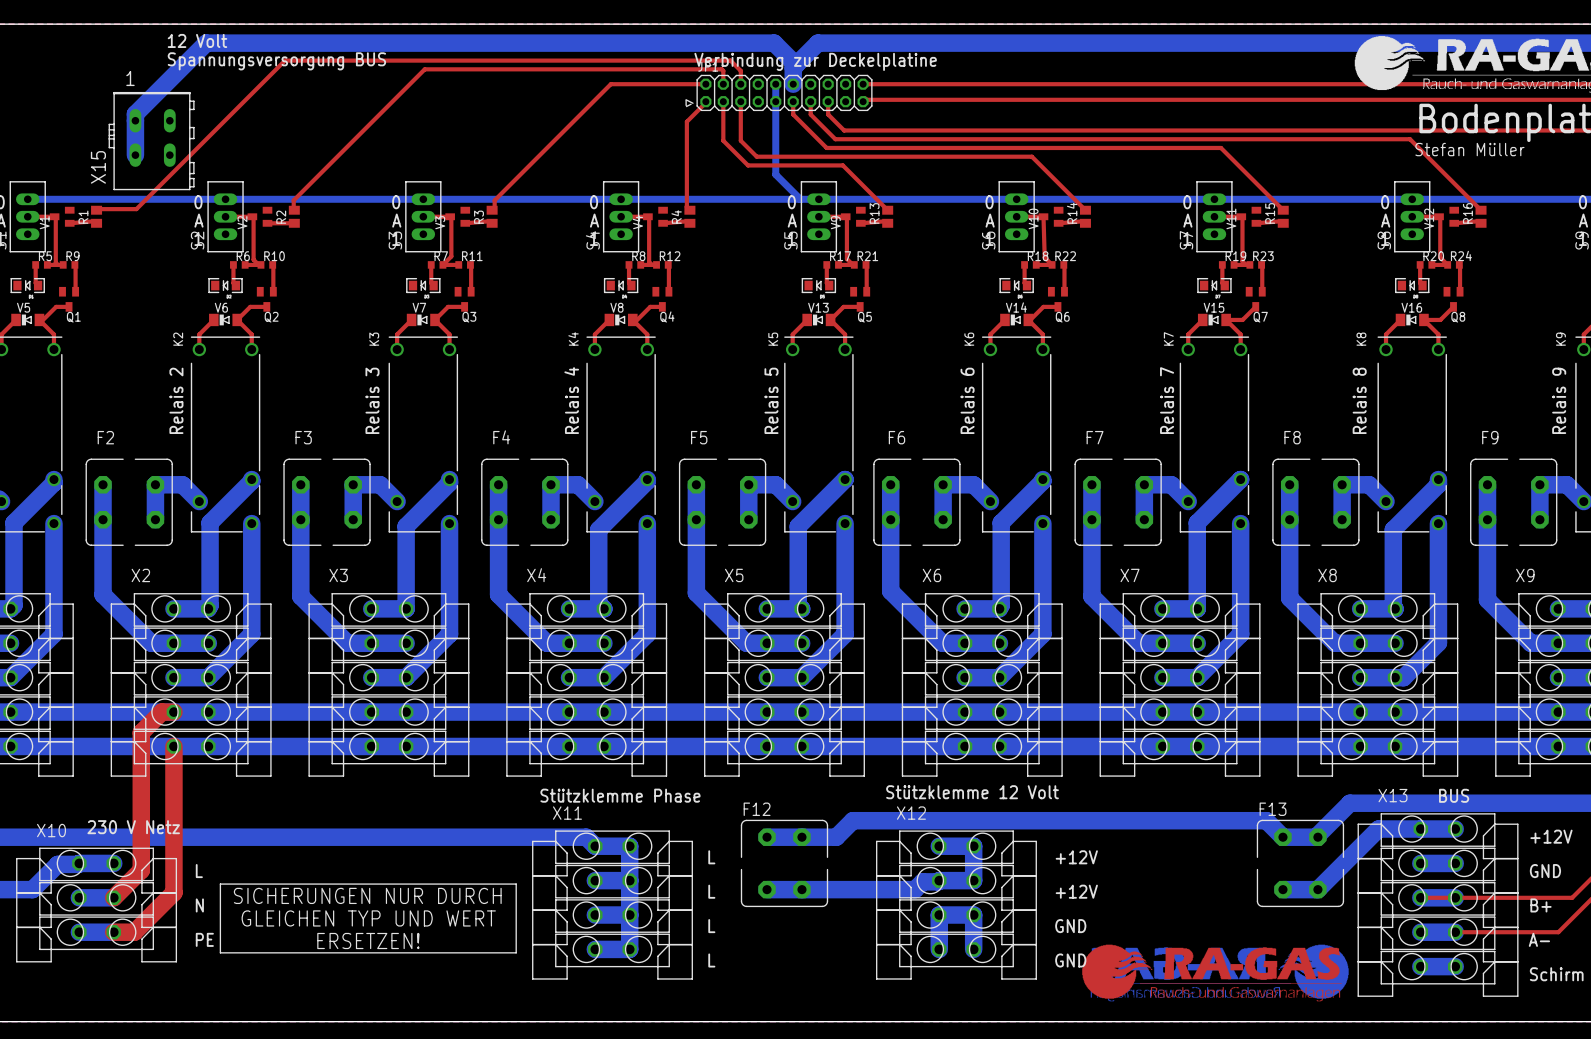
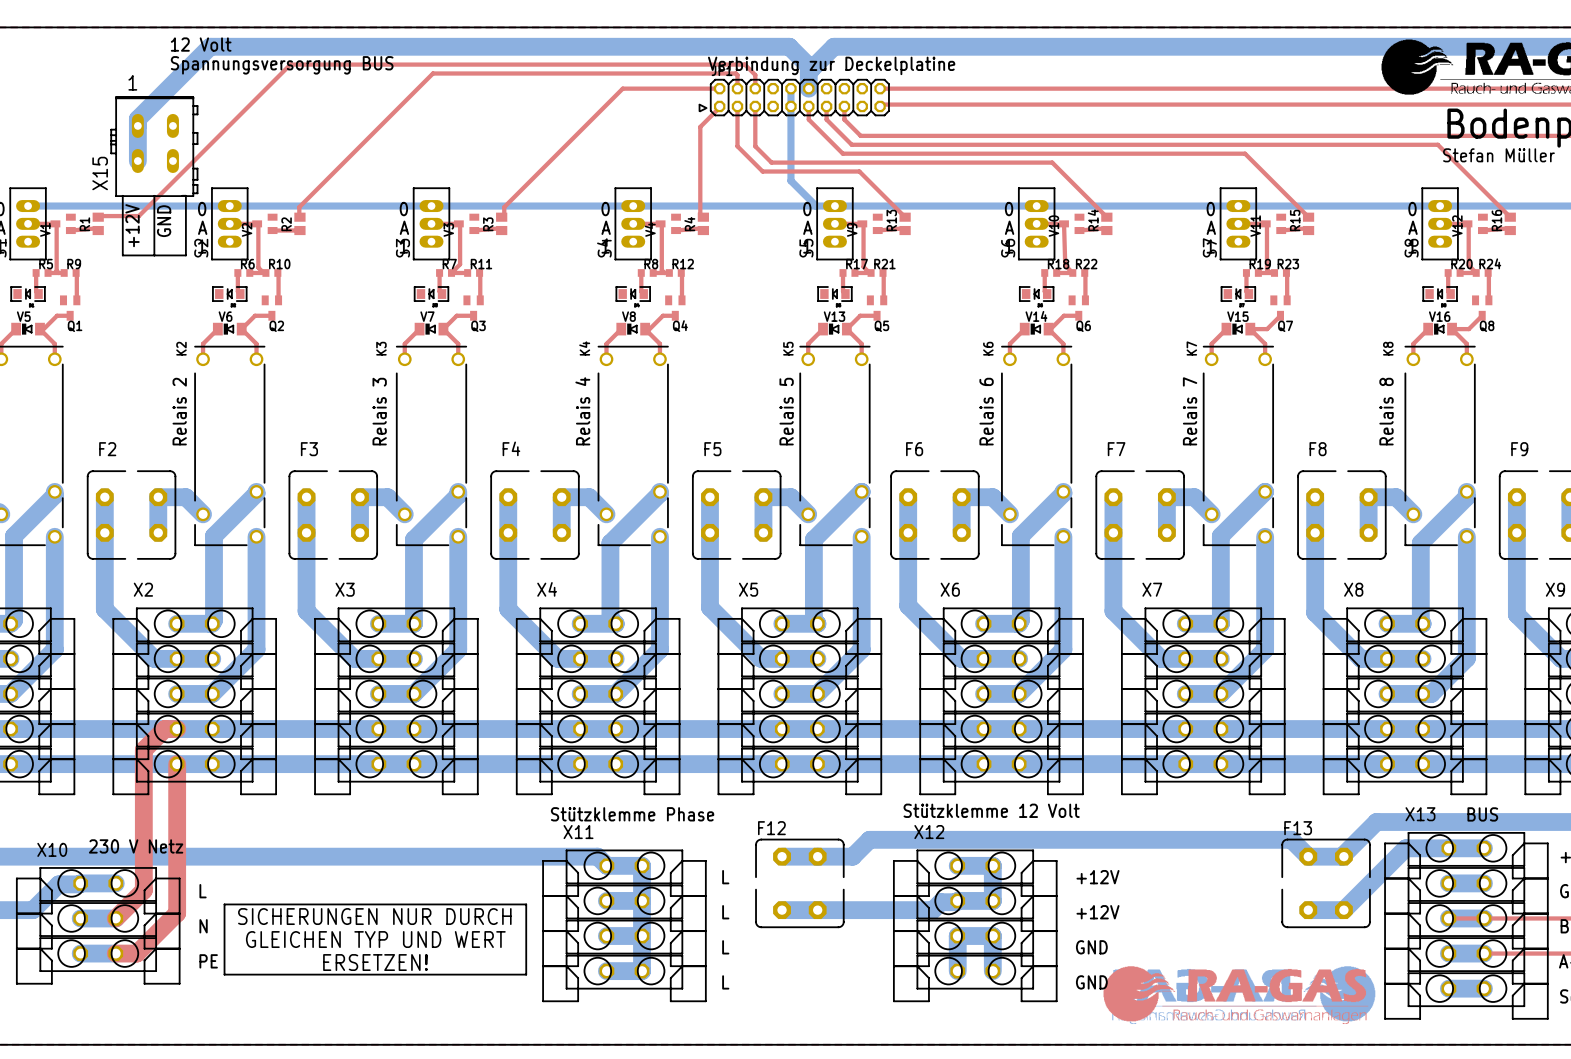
line: none -> (122, 195) (122, 255) (185, 255) (185, 195) (182, 195)
line: none -> (154, 195) (154, 255)
text: none -> GND (164, 221)
text: none -> +12V (132, 225)

